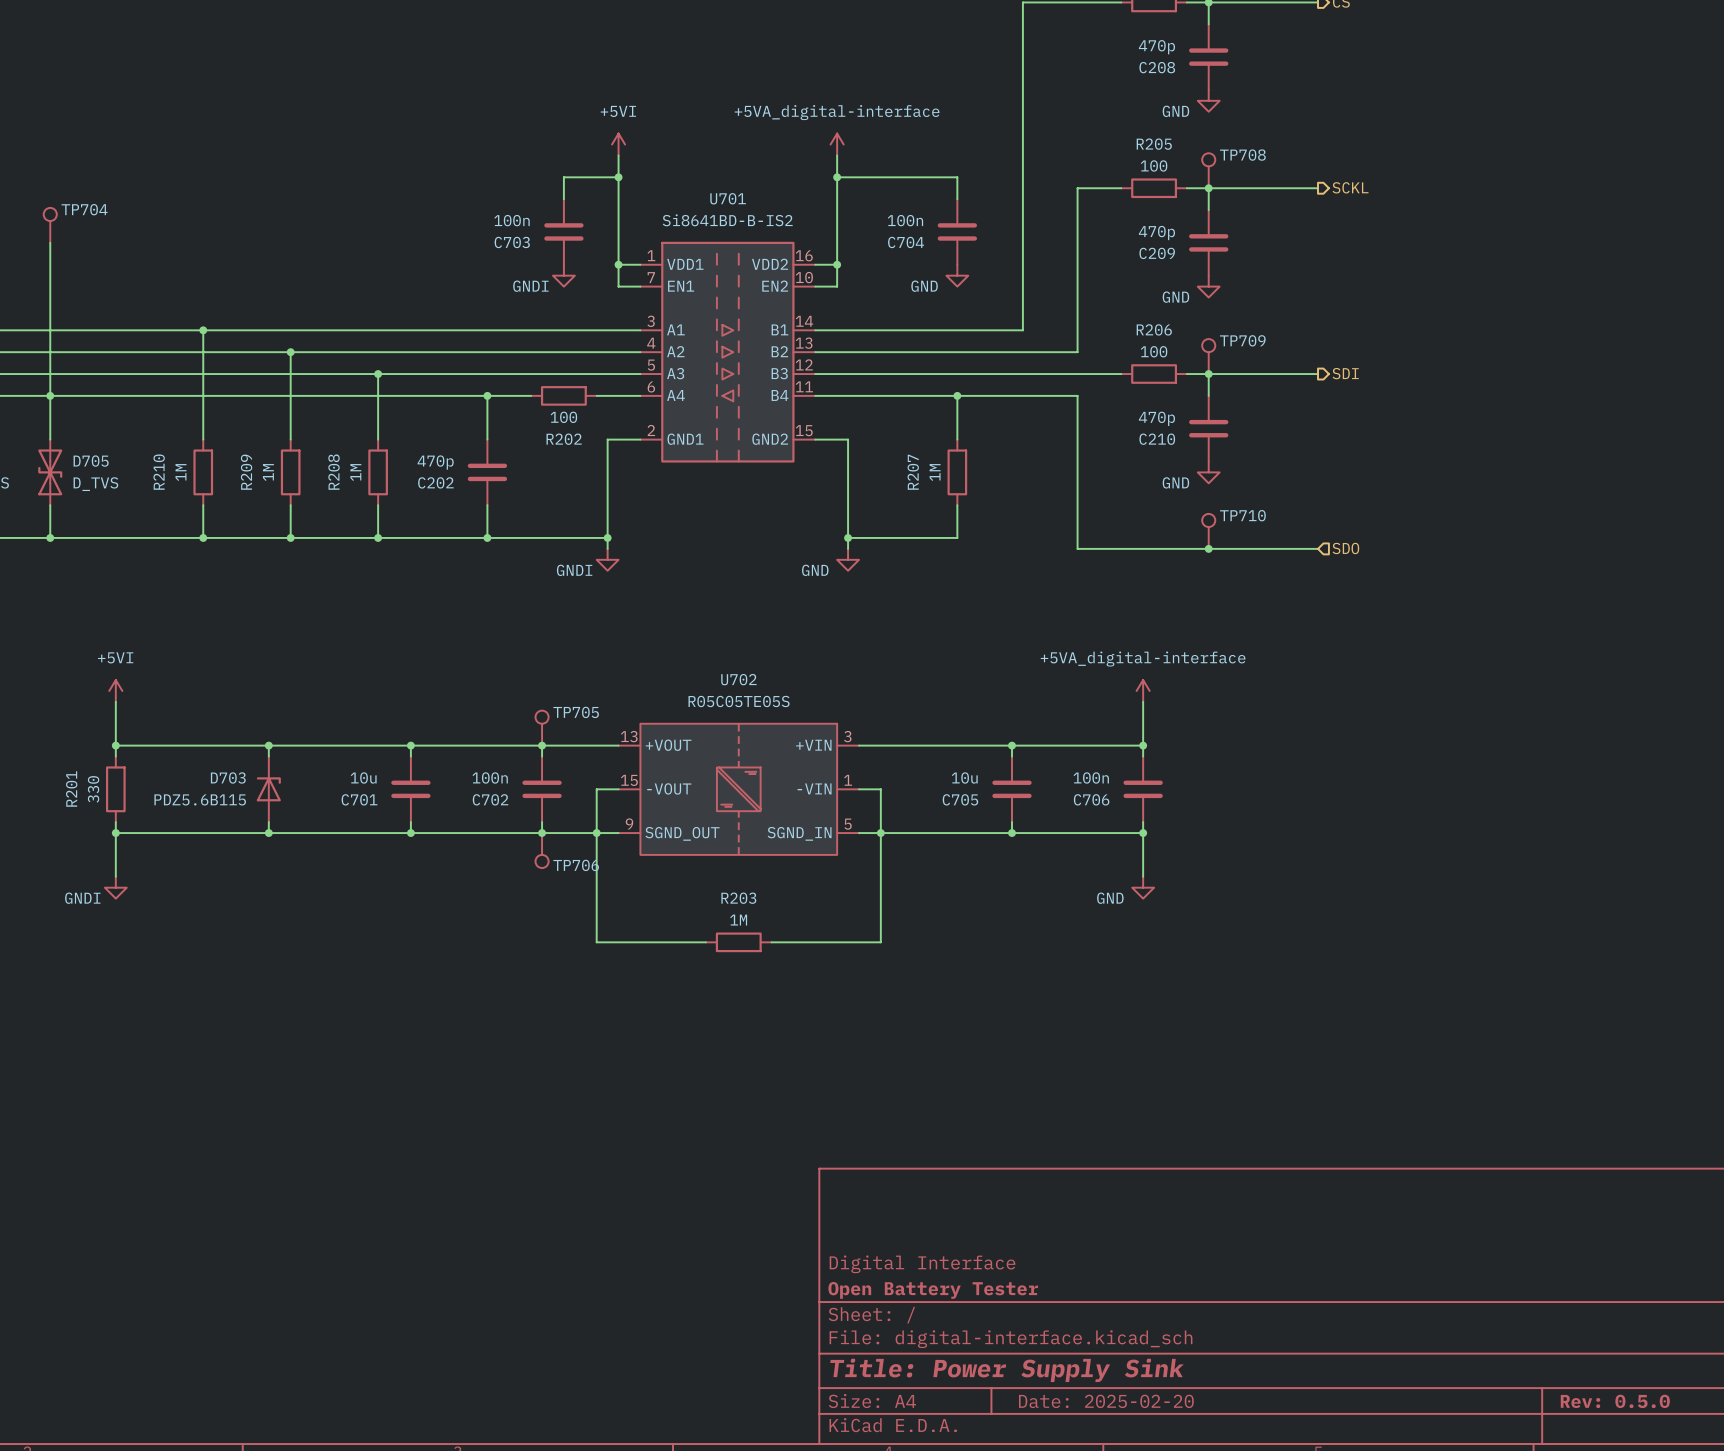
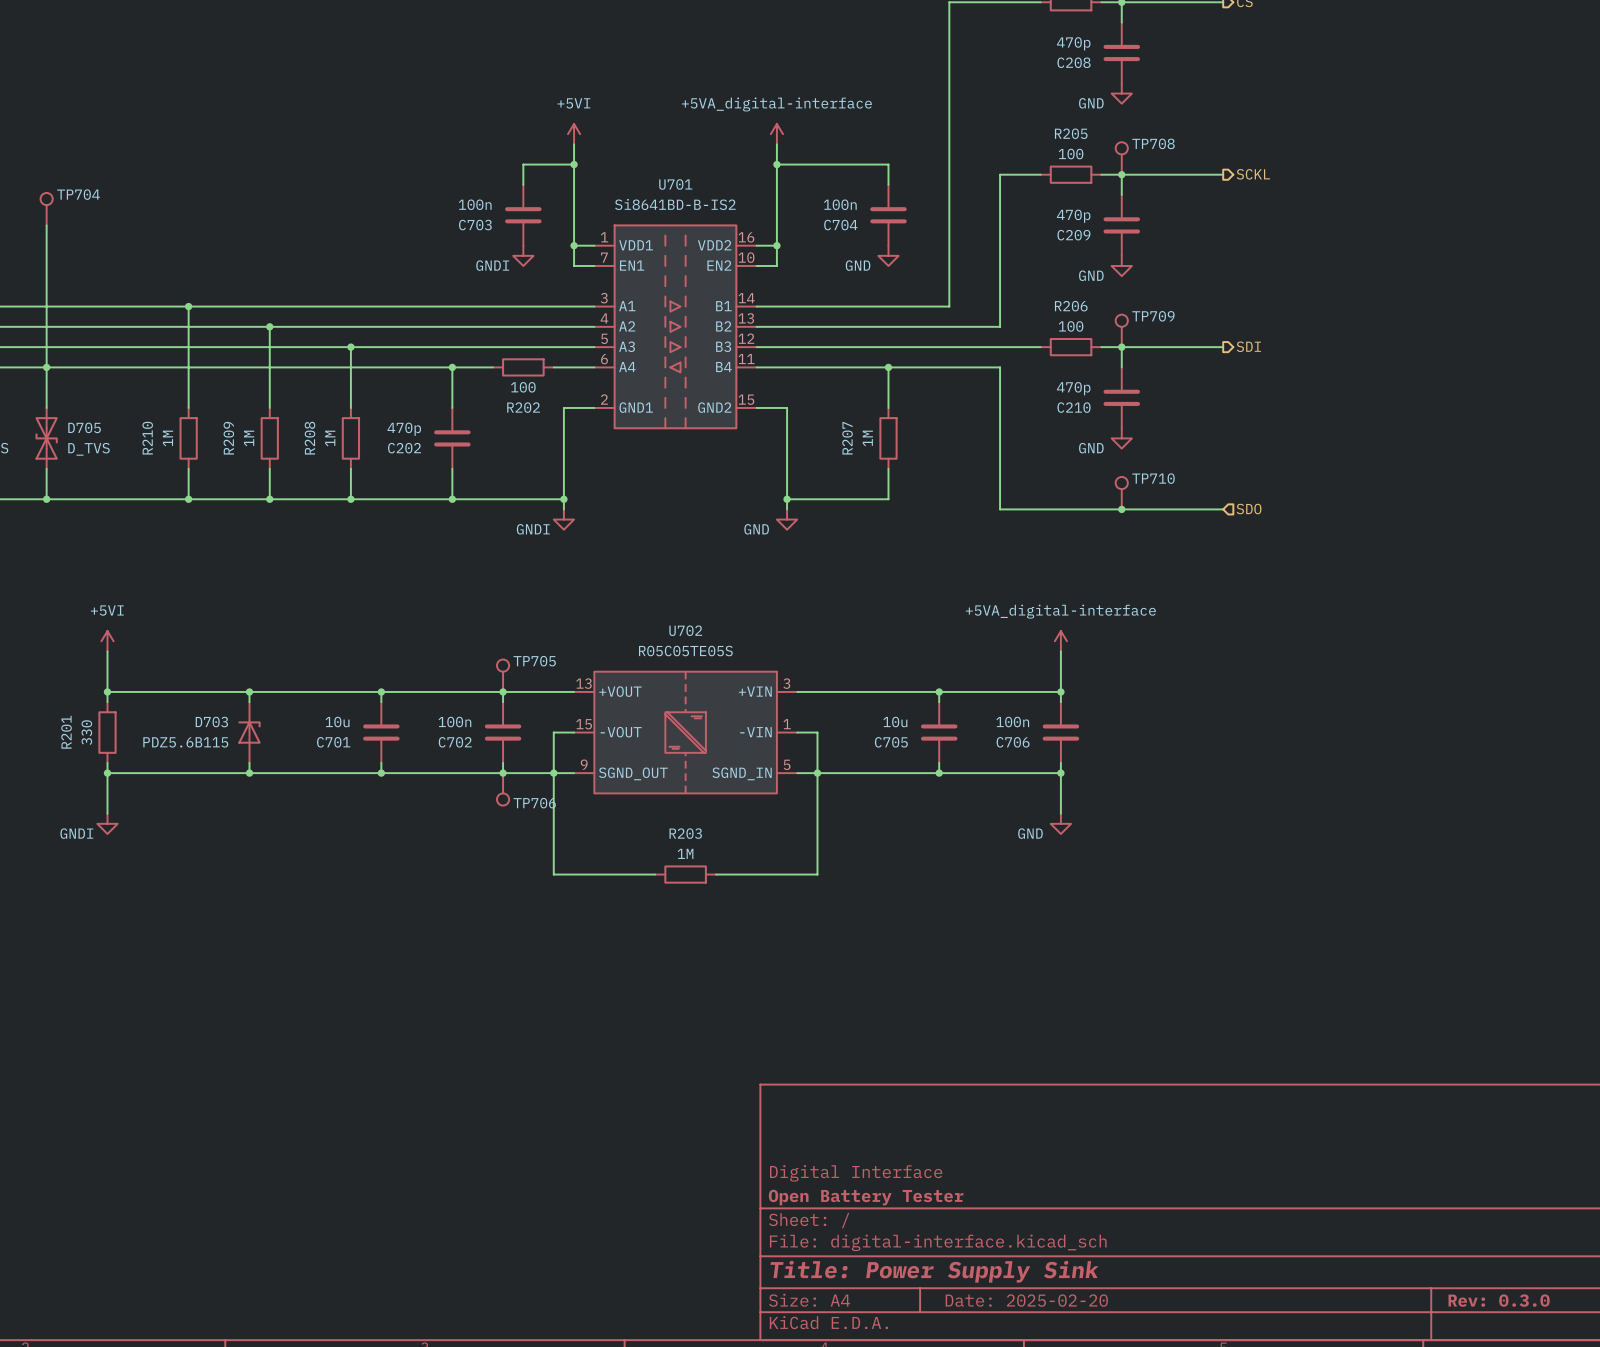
title block: Rev: 0.5.0 (1615, 1401) -> Rev: 0.3.0 (1499, 1300)

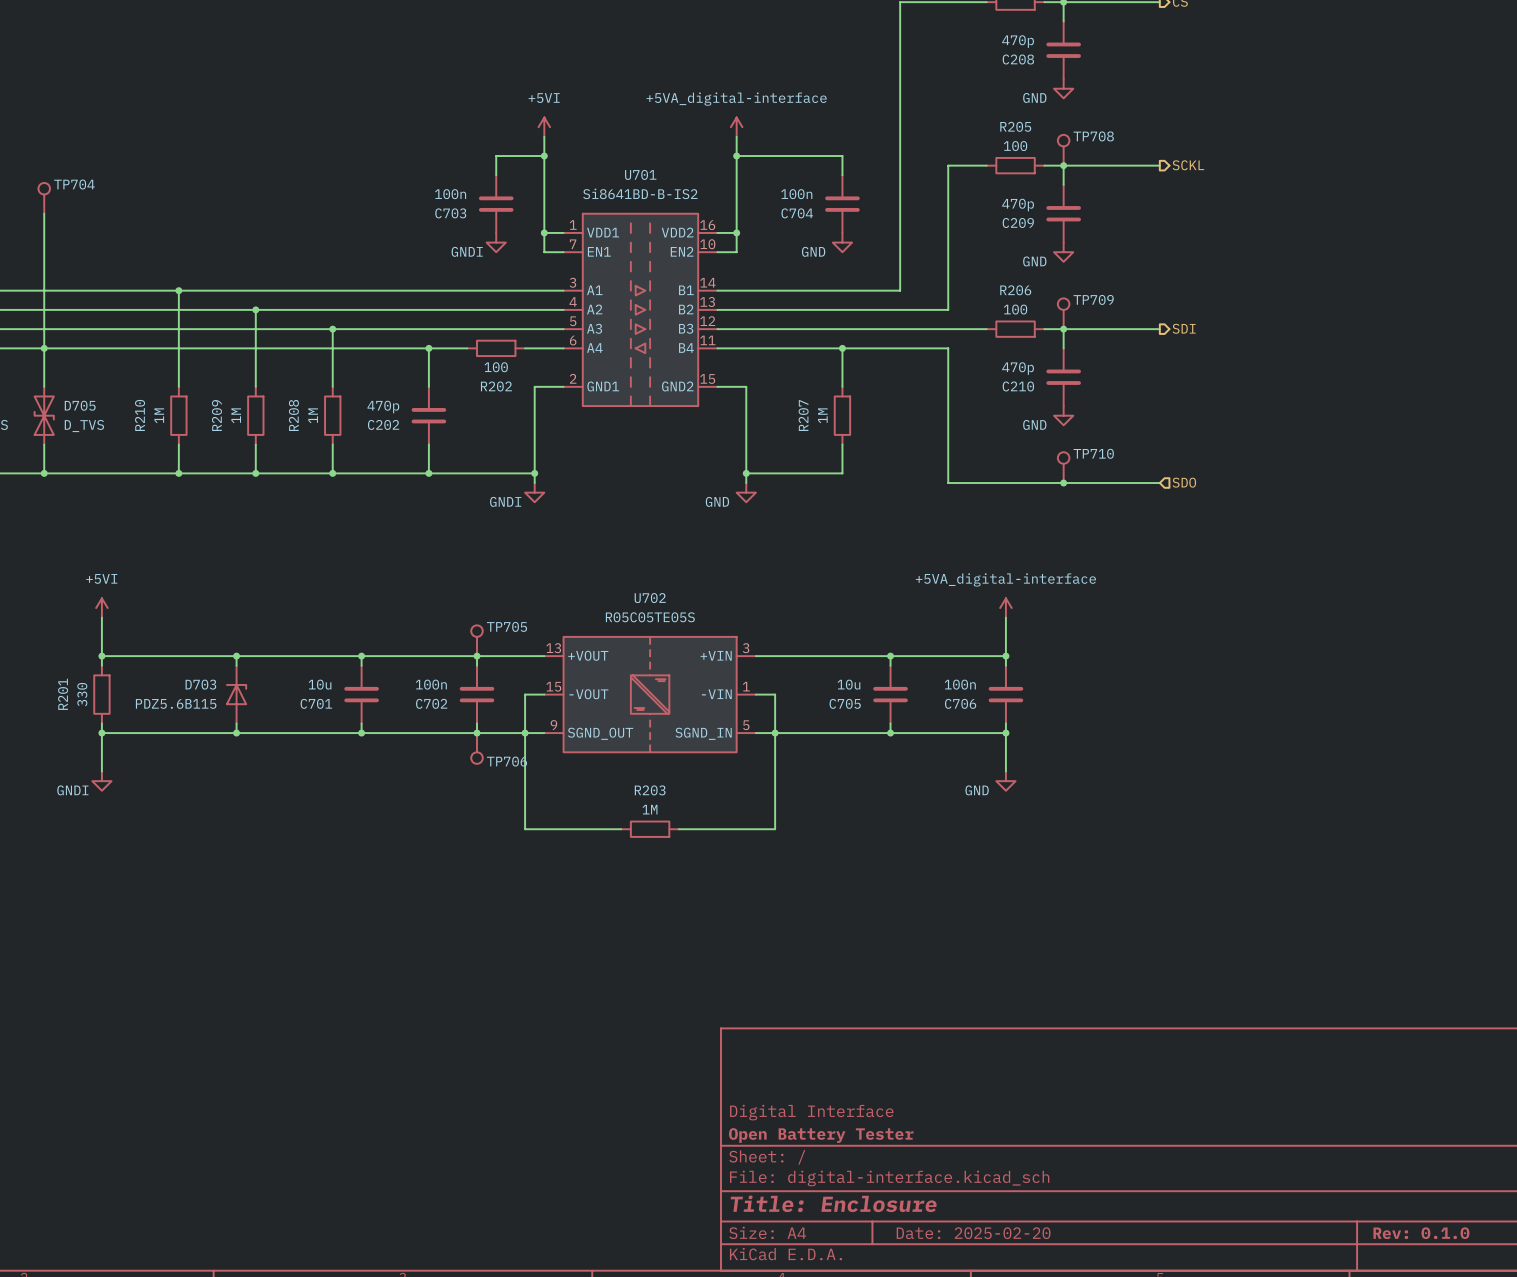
title block: Title: Power Supply Sink (934, 1271) -> Title: Enclosure (833, 1203)
title block: Rev: 0.3.0 (1499, 1300) -> Rev: 0.1.0 (1421, 1233)

